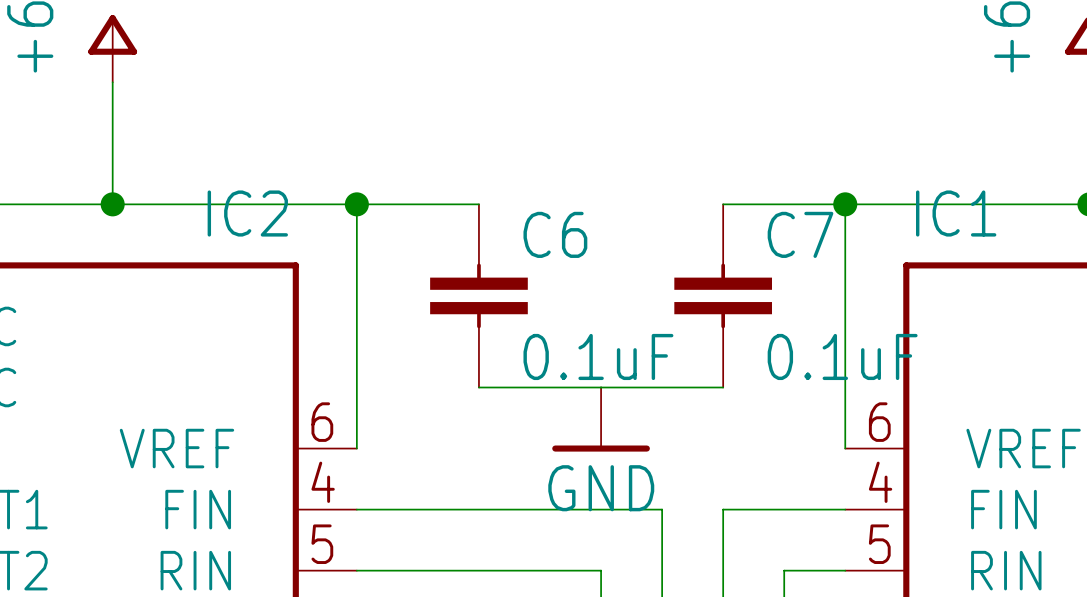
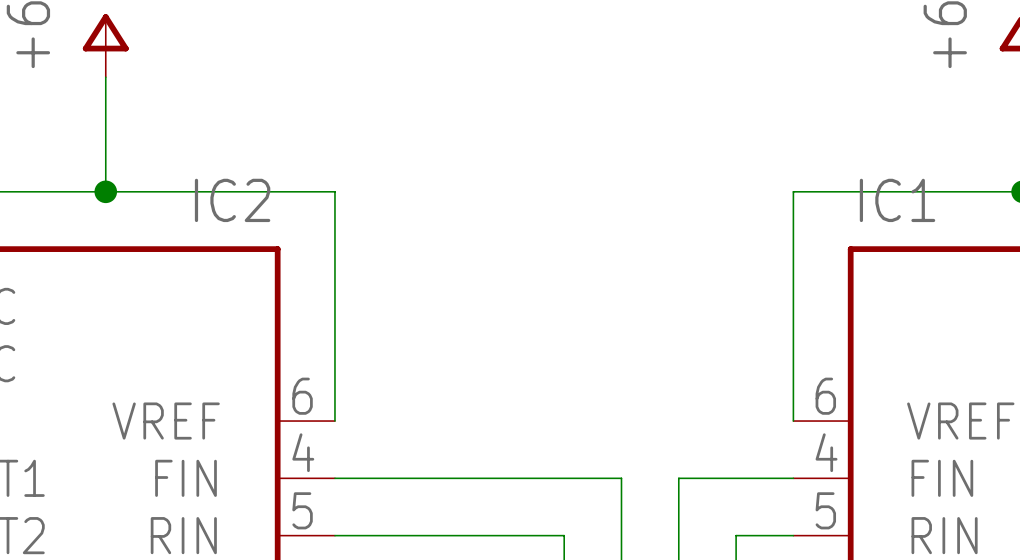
wire: (356, 204) (478, 204) -> none
junction: (356, 204) -> none
wire: (723, 204) (845, 204) -> none
junction: (845, 204) -> none
C6: 0.1uF (478, 295) -> none
C7: 0.1uF (723, 295) -> none
wire: (478, 387) (723, 387) -> none
power symbol: GND (601, 419) -> none

